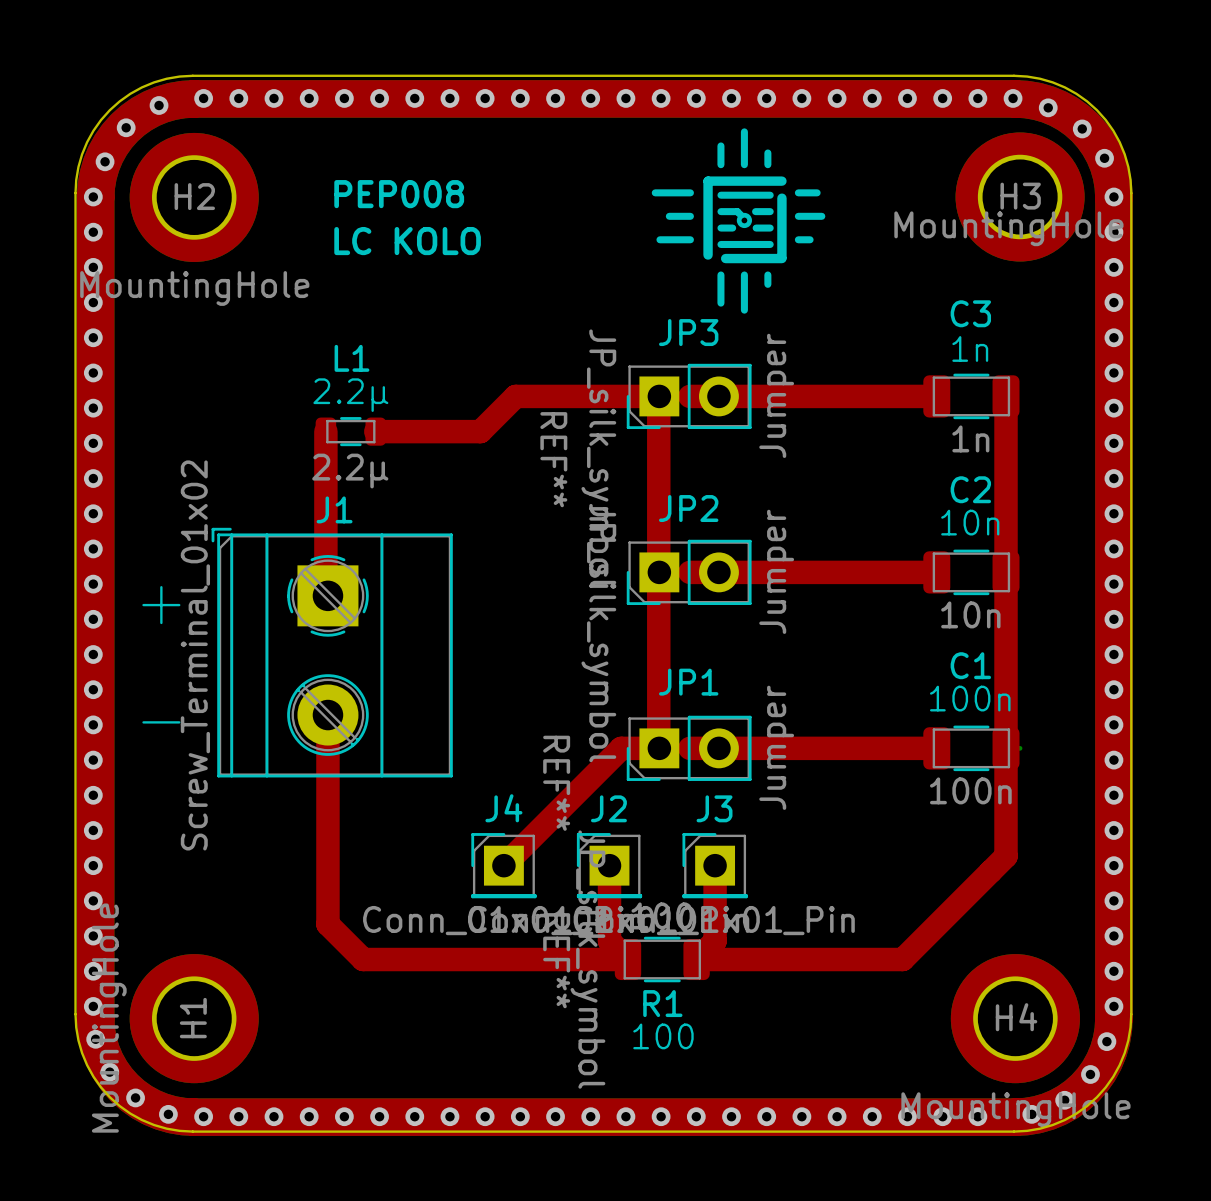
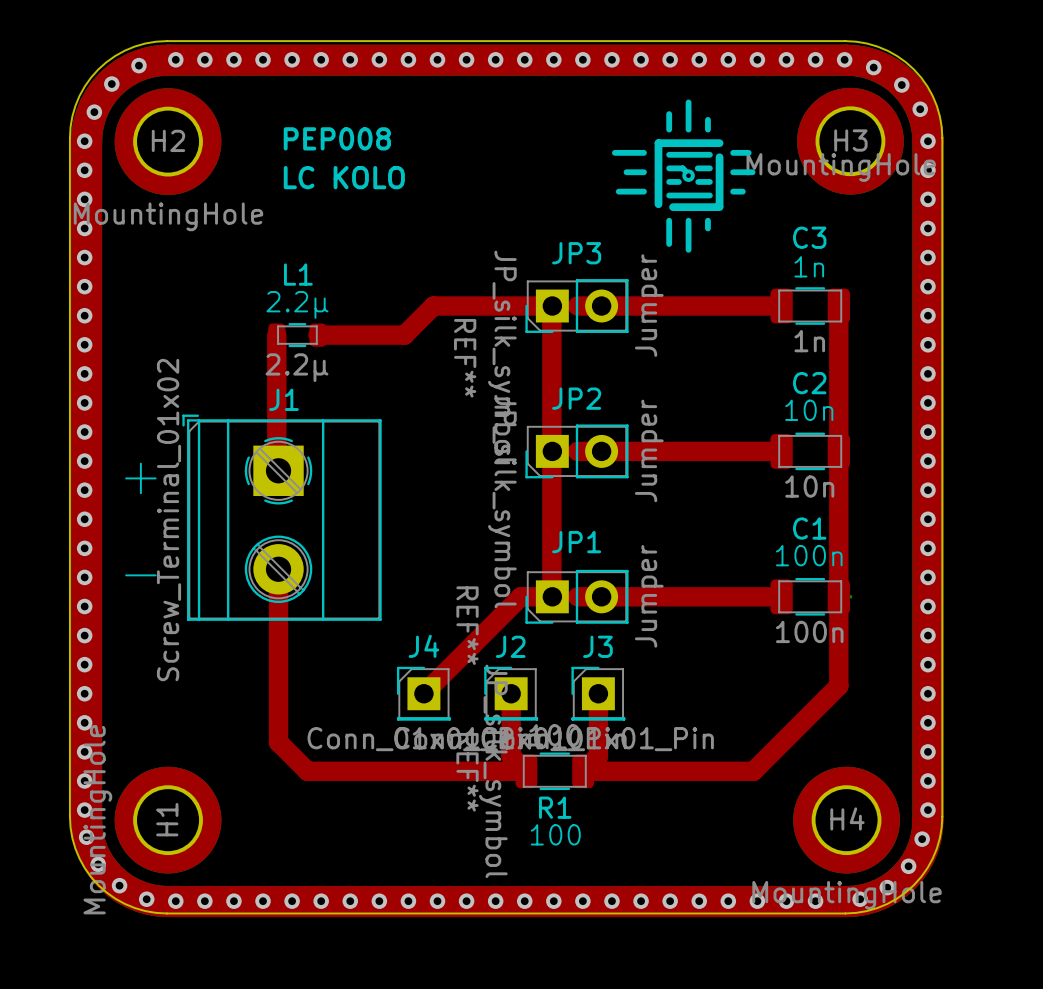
drawing position: (738, 221) -> (683, 176)

